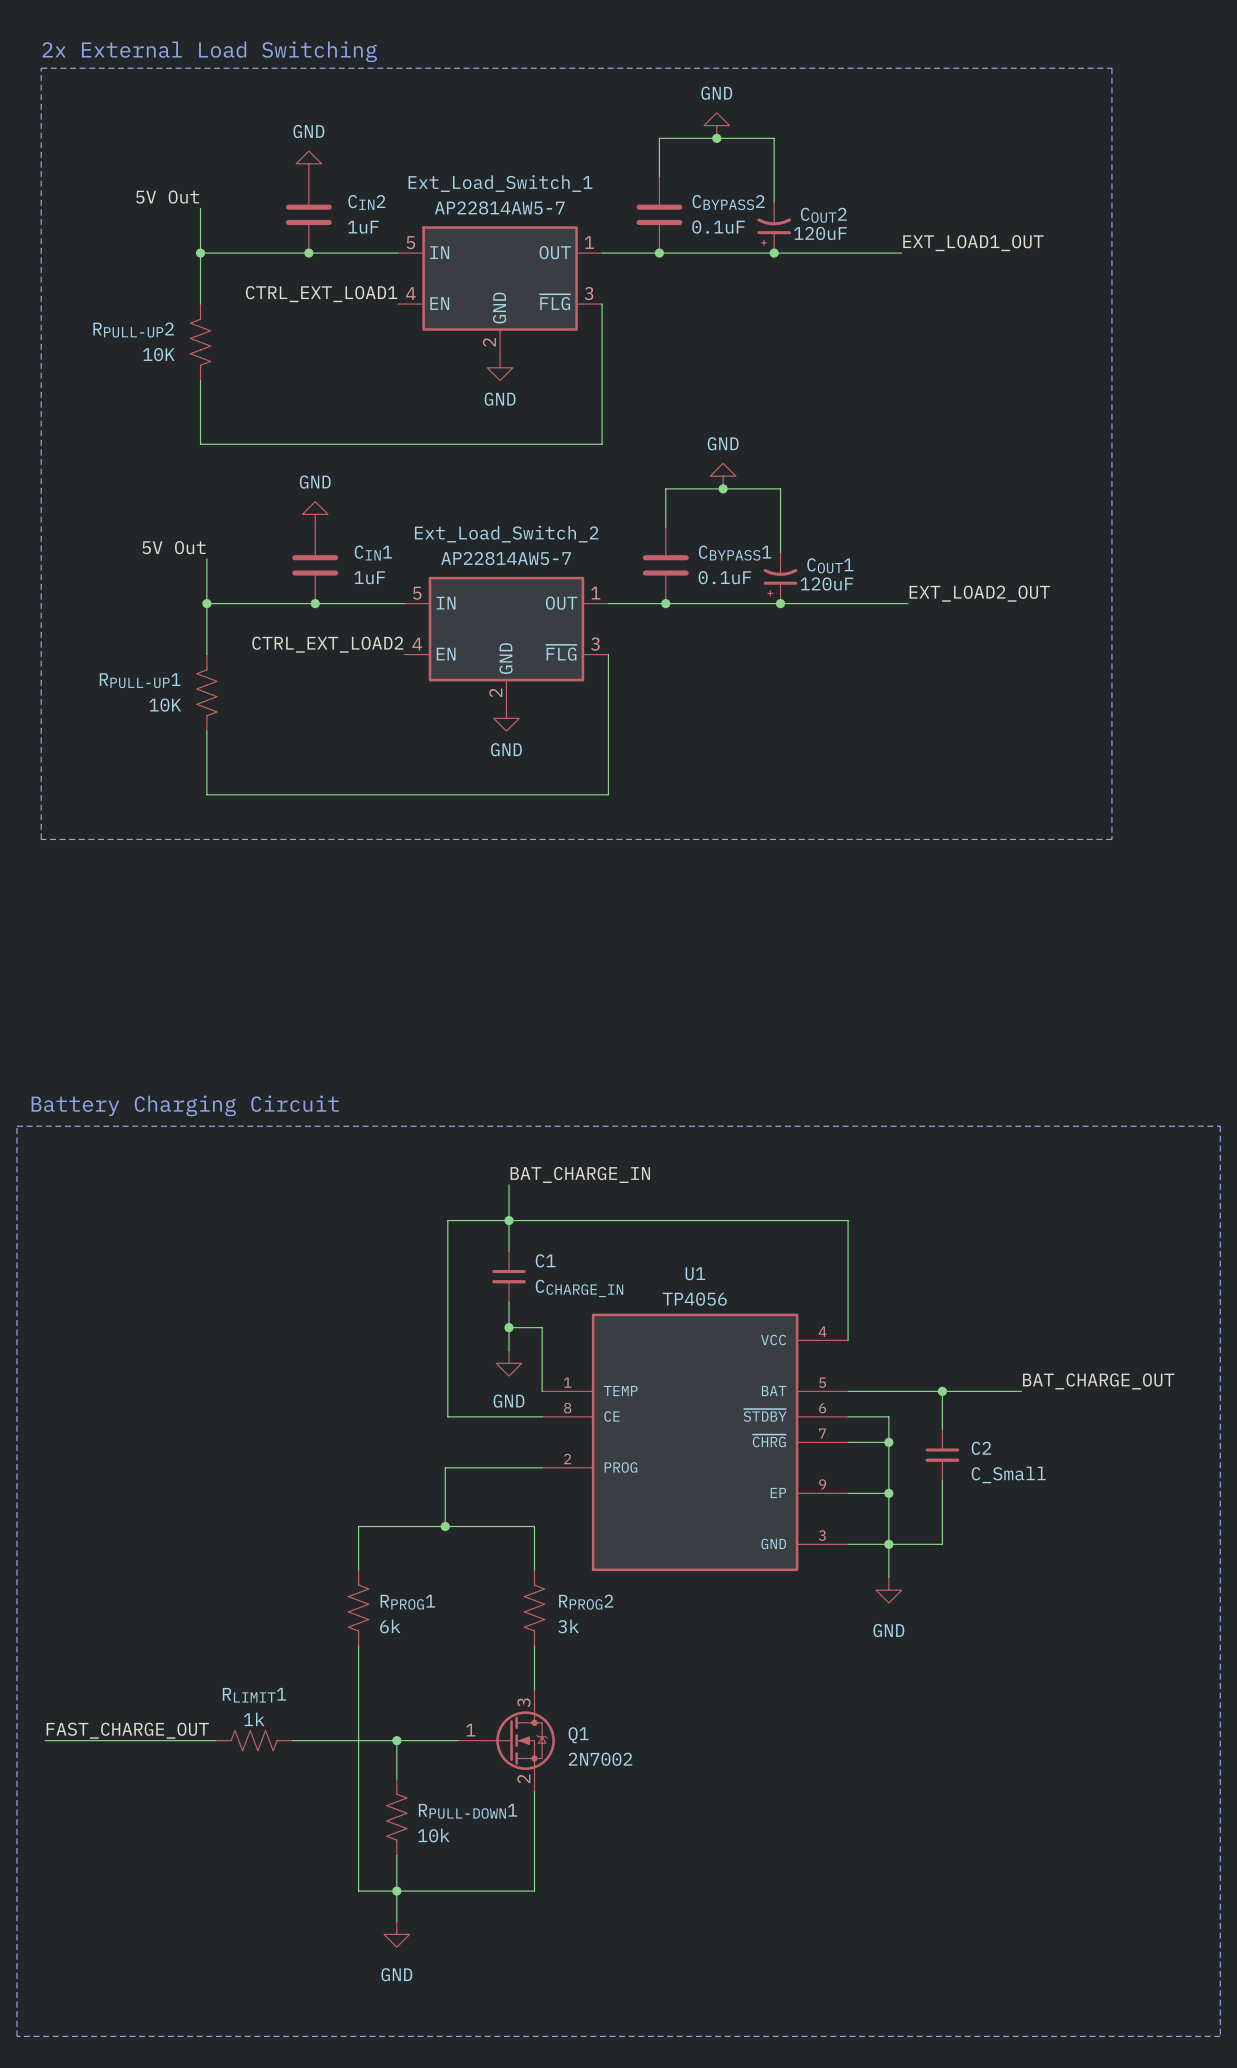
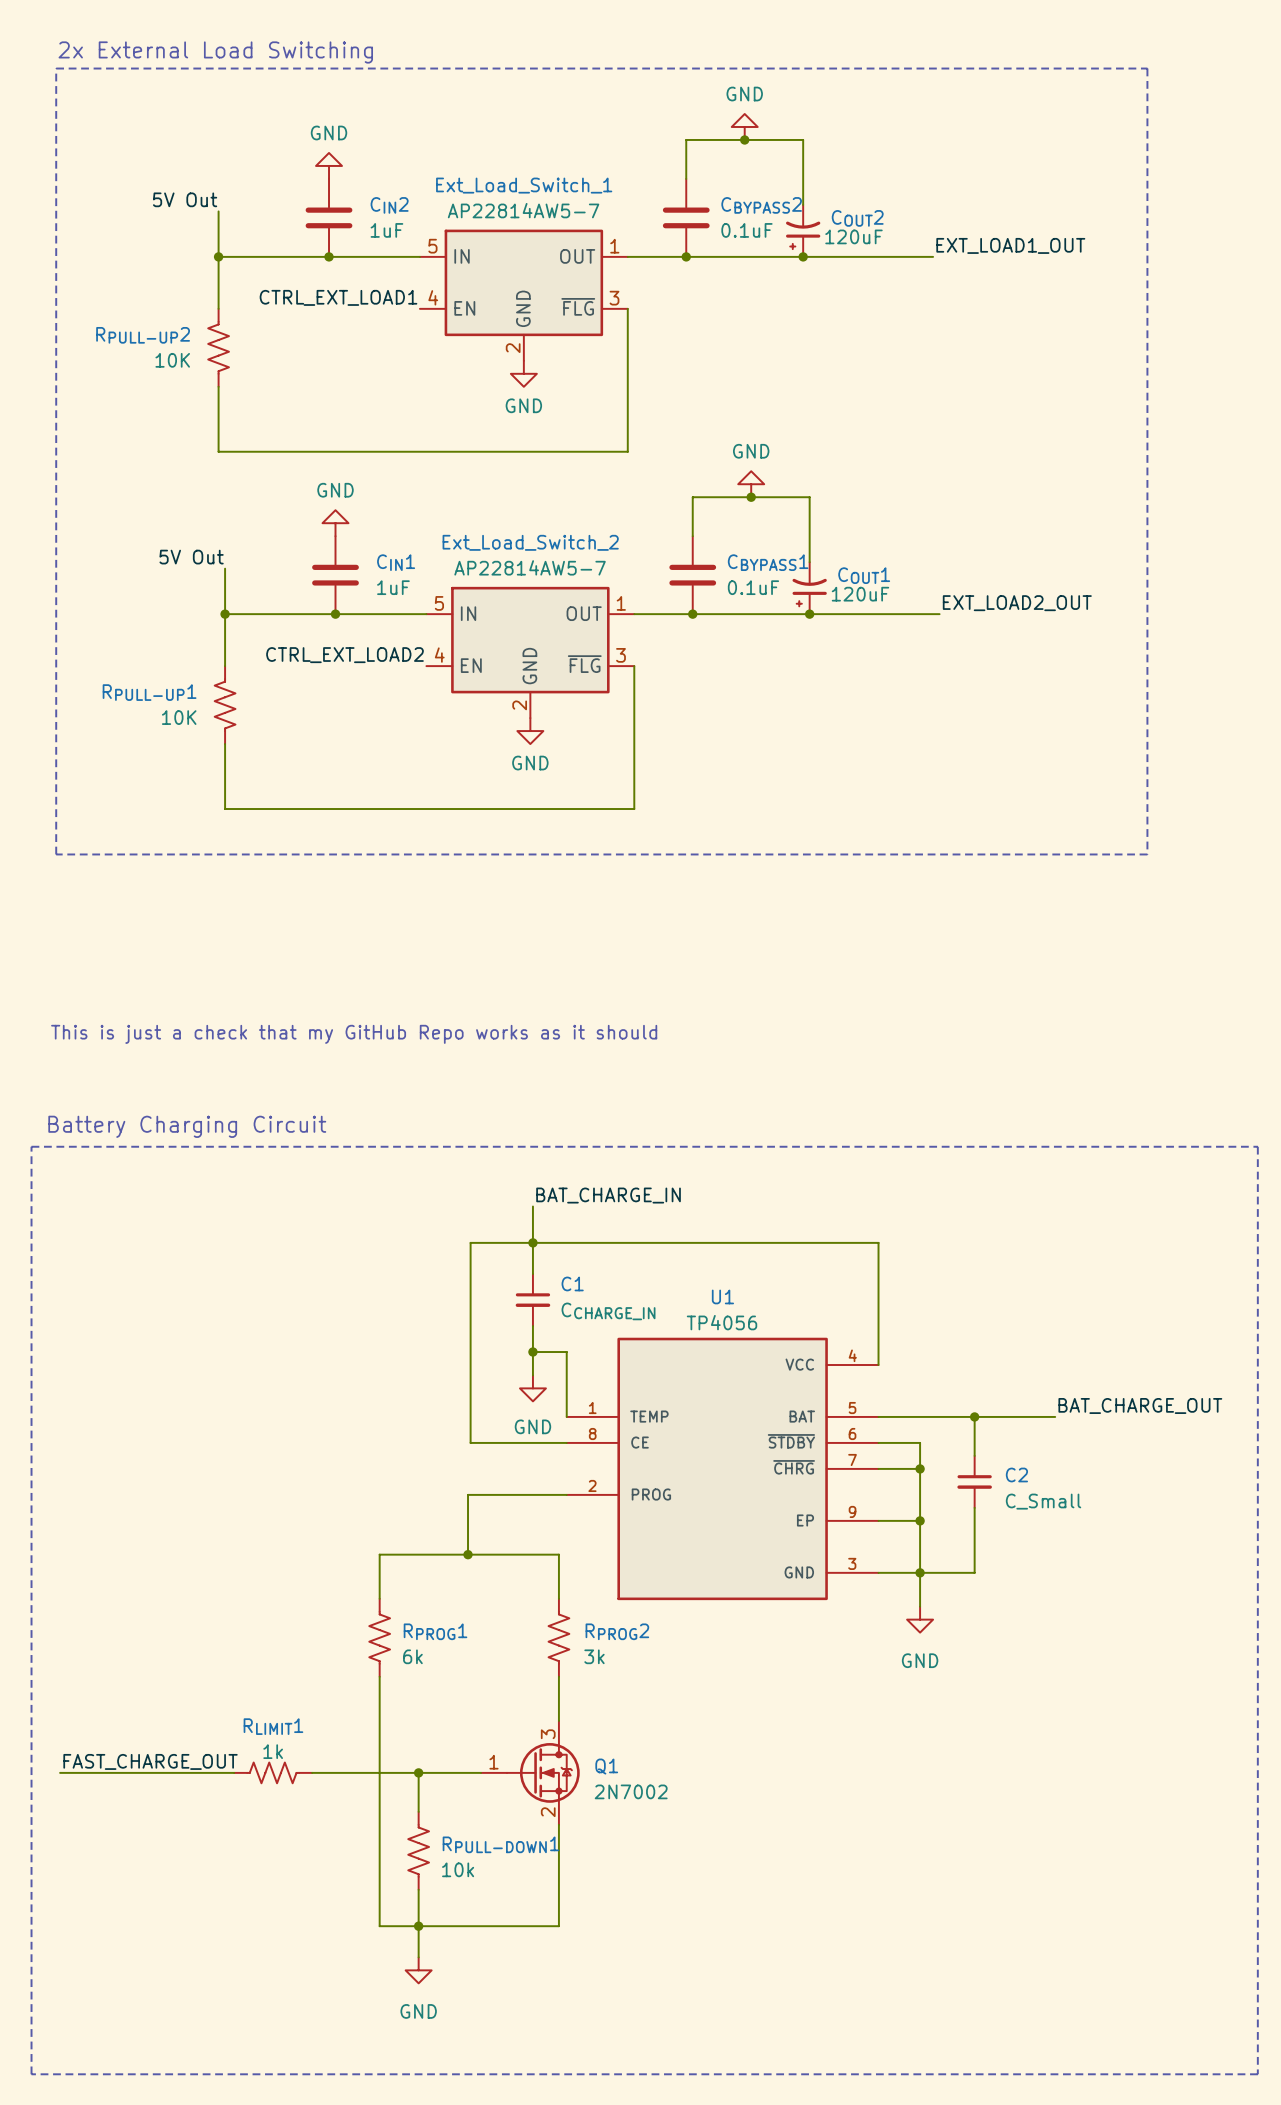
text: none -> This is just a check that my GitHub Repo works as it should (354, 1034)

